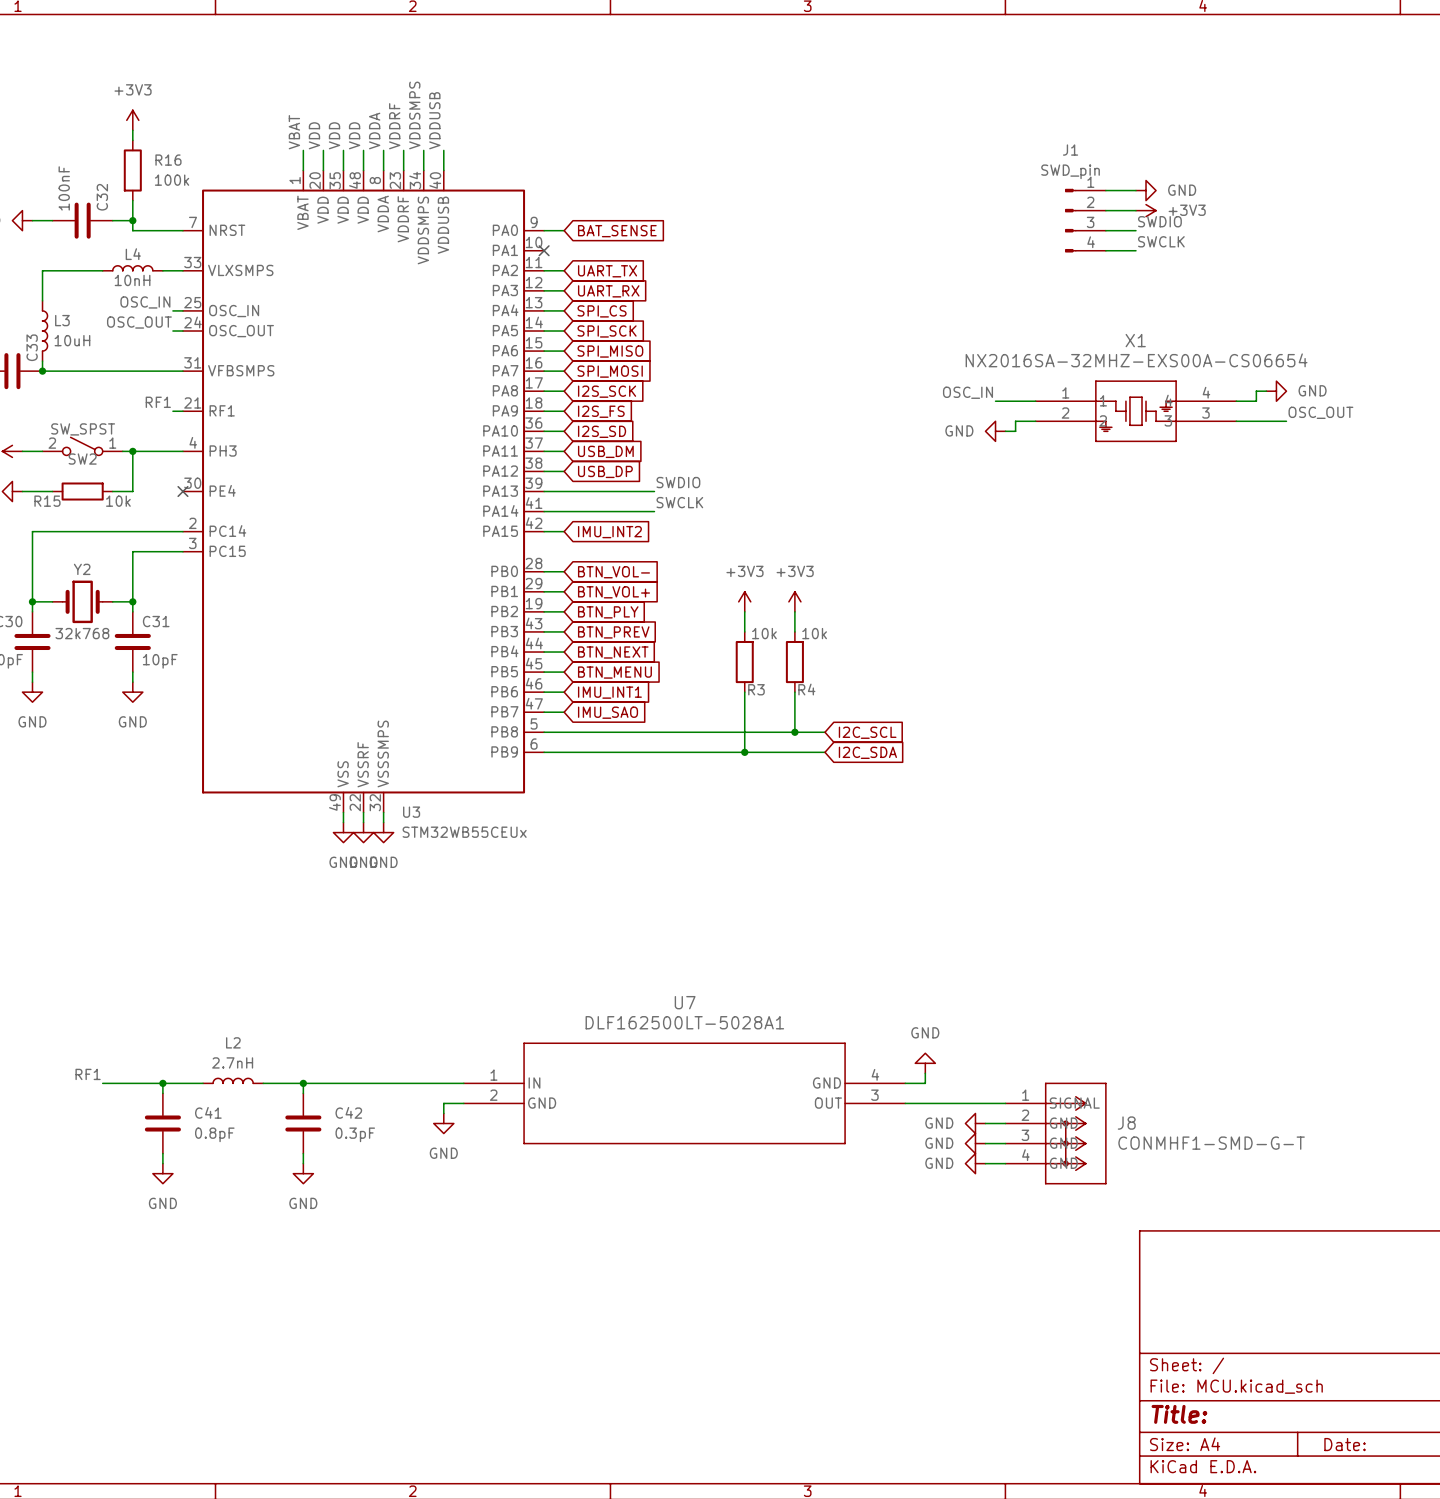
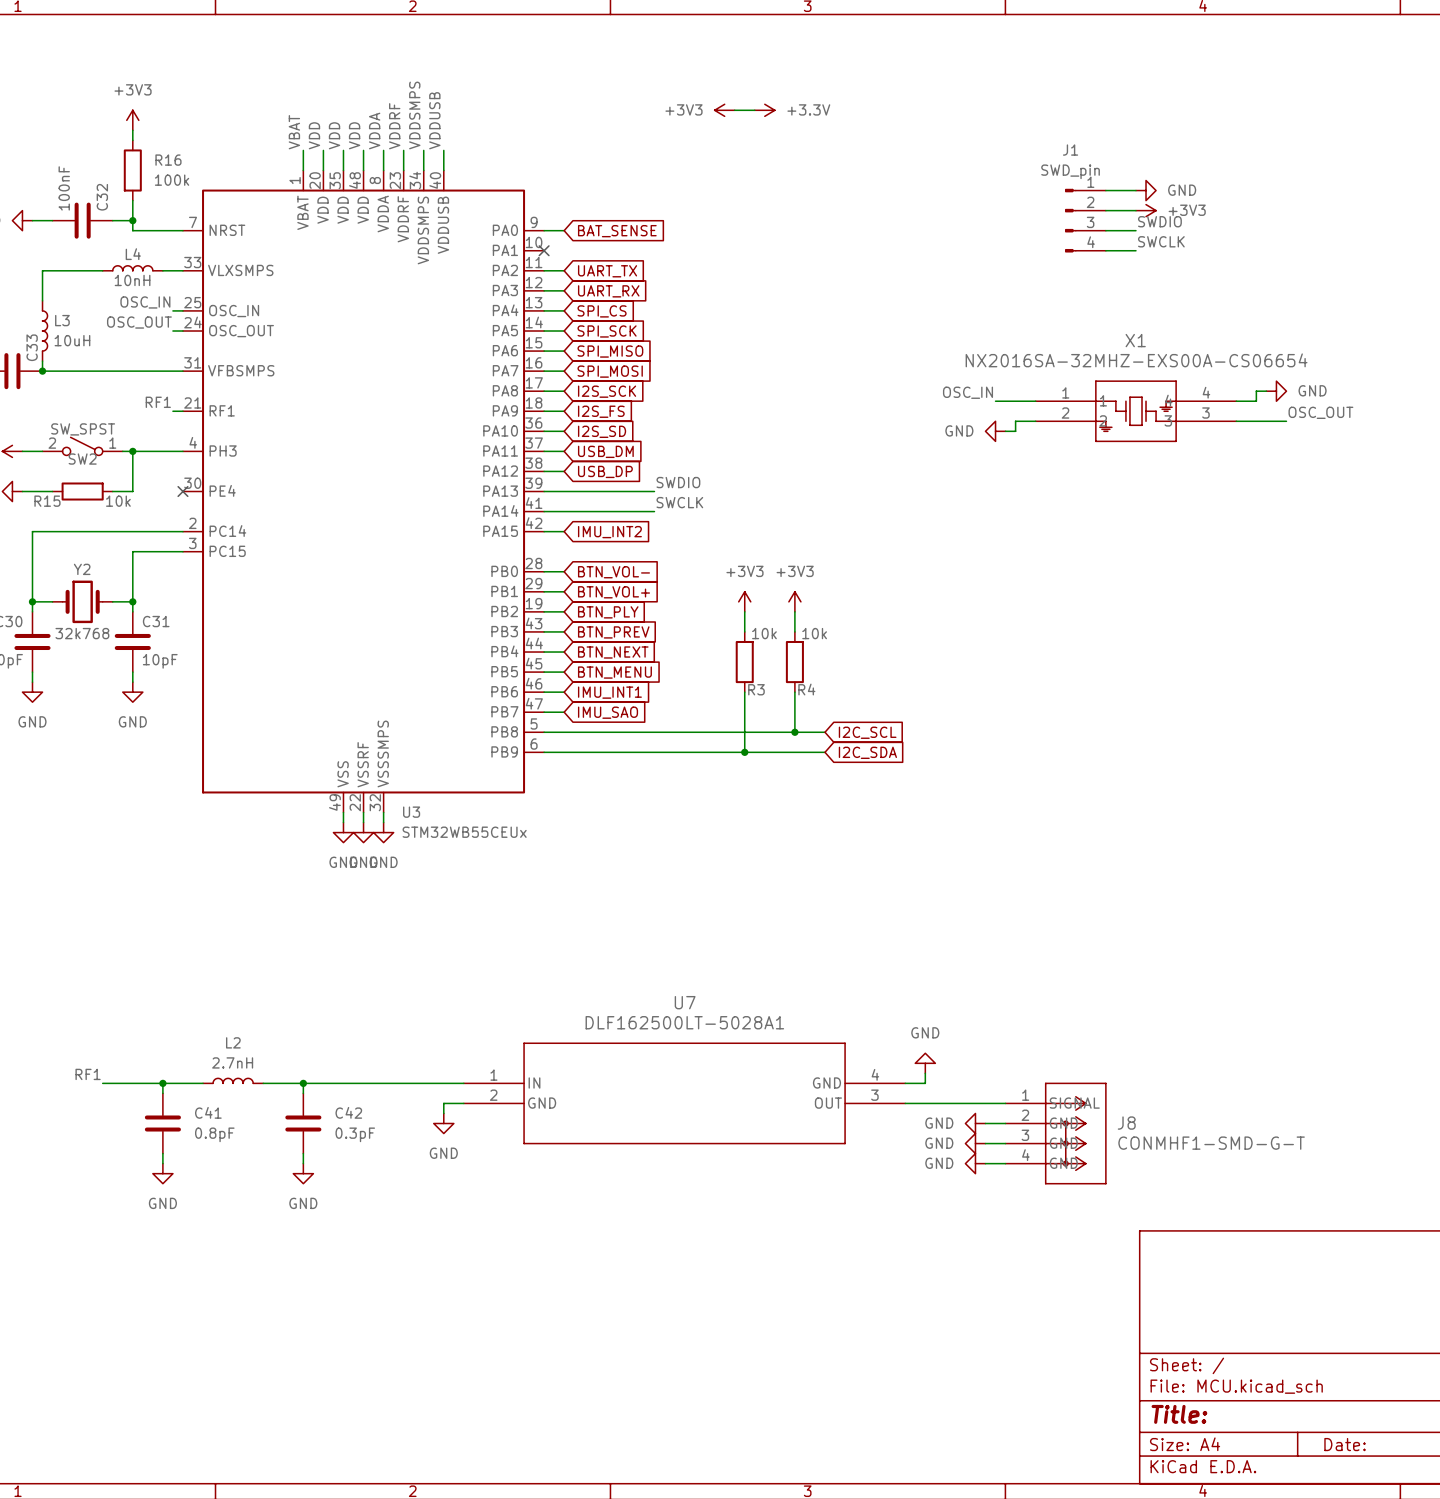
power symbol: none -> +3V3 (724, 110)
wire: none -> (734, 110) (754, 110)
power symbol: none -> +3.3V (764, 110)

